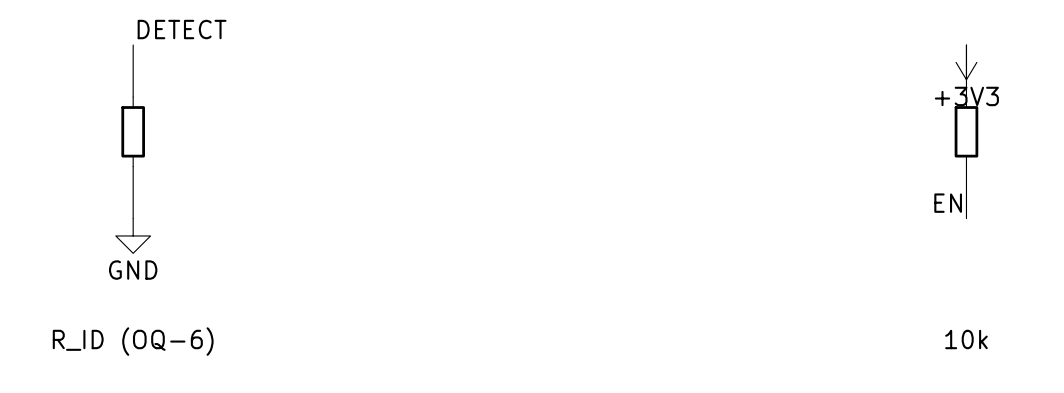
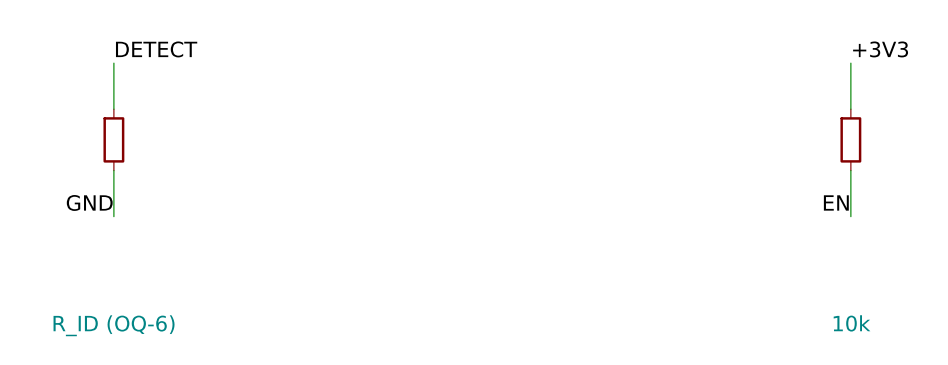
label: none -> +3V3 (880, 49)
power symbol: +3V3 (966, 62) -> none
label: none -> GND (89, 202)
power symbol: GND (133, 235) -> none

